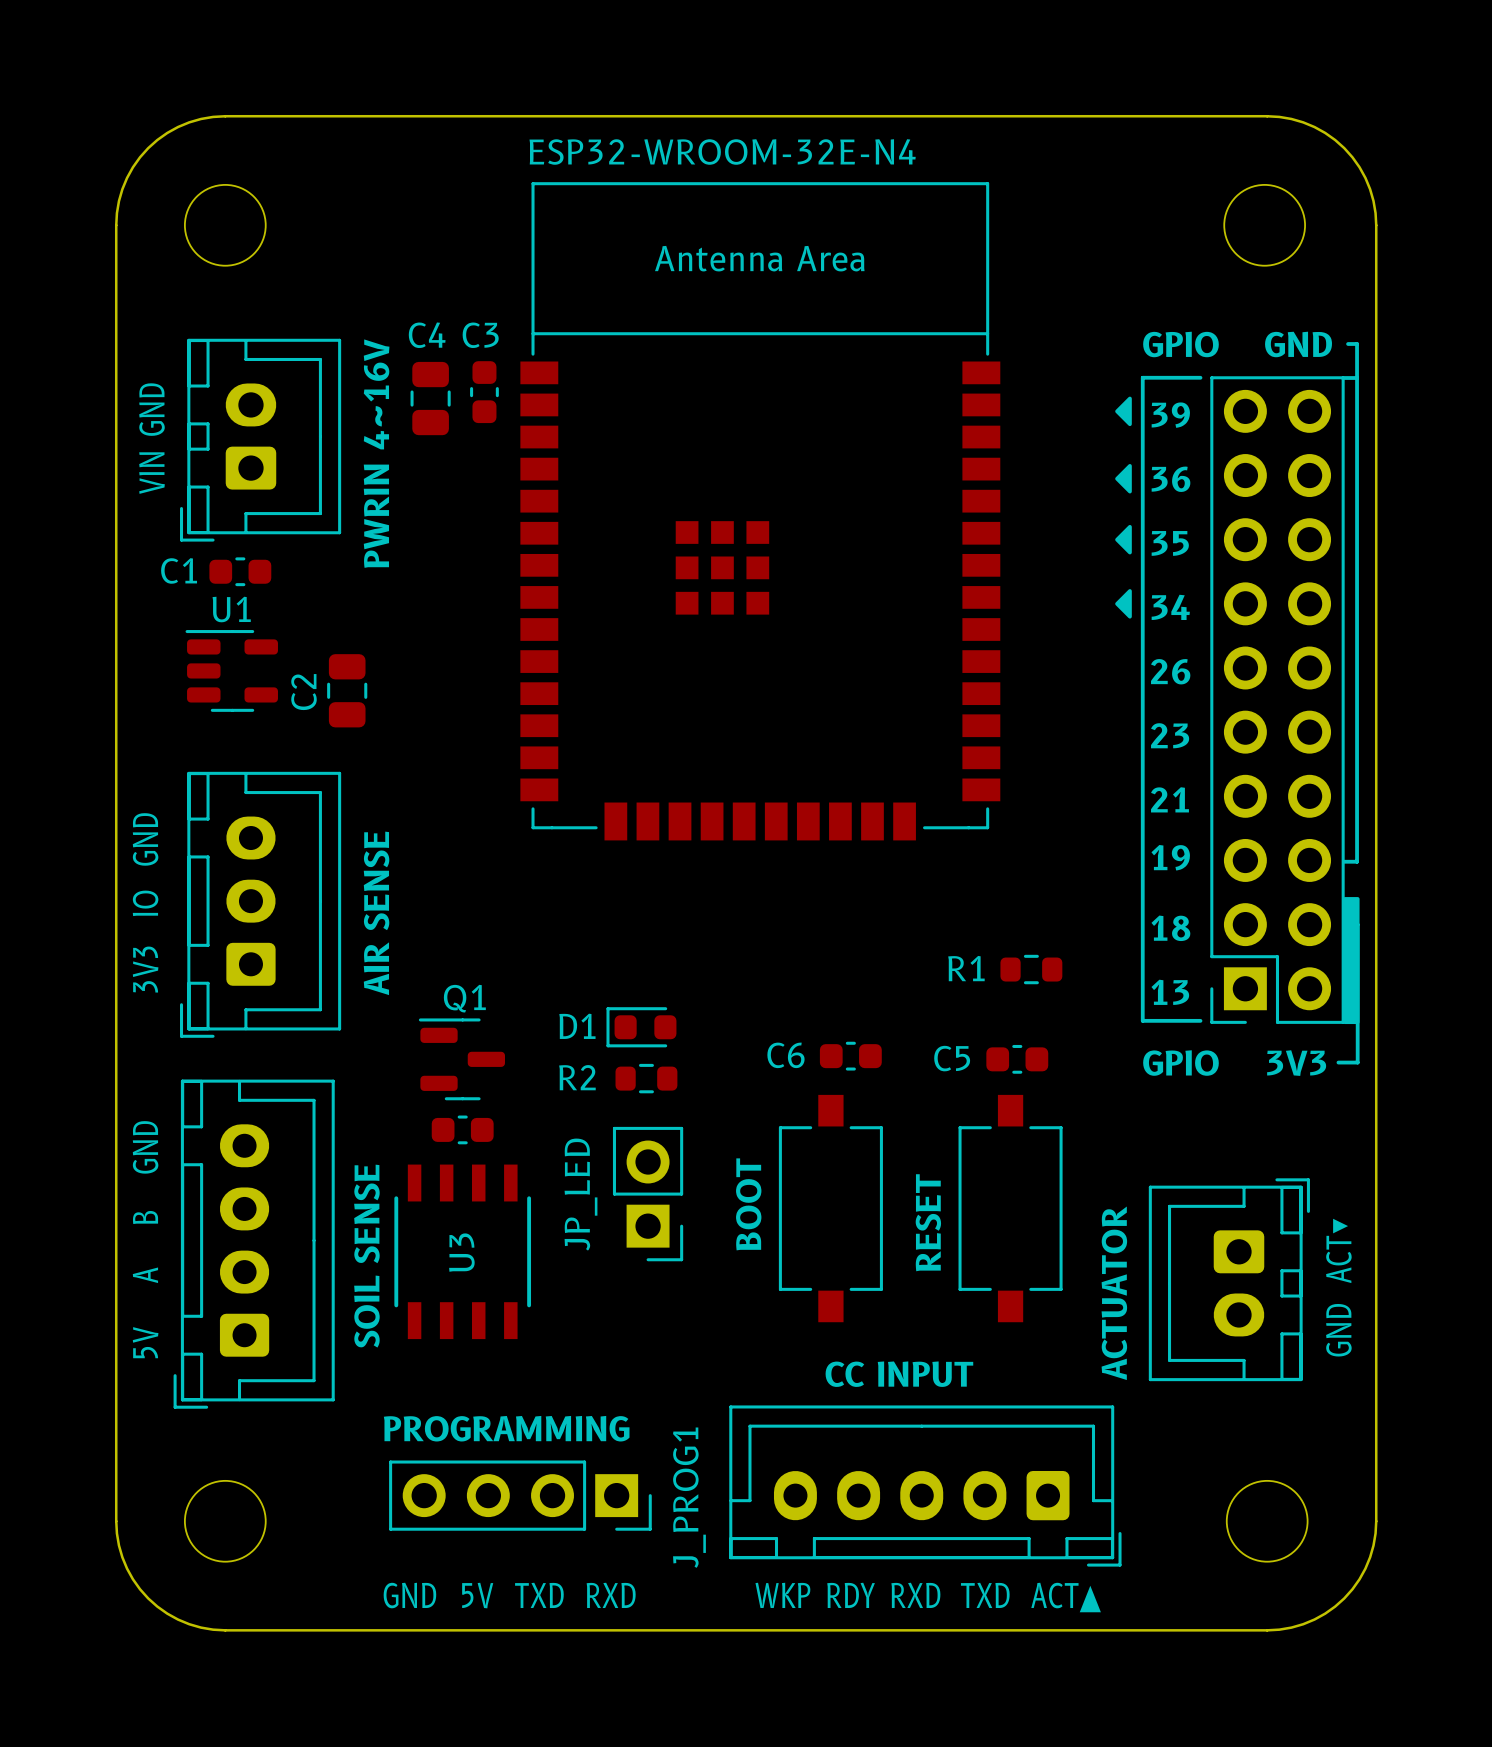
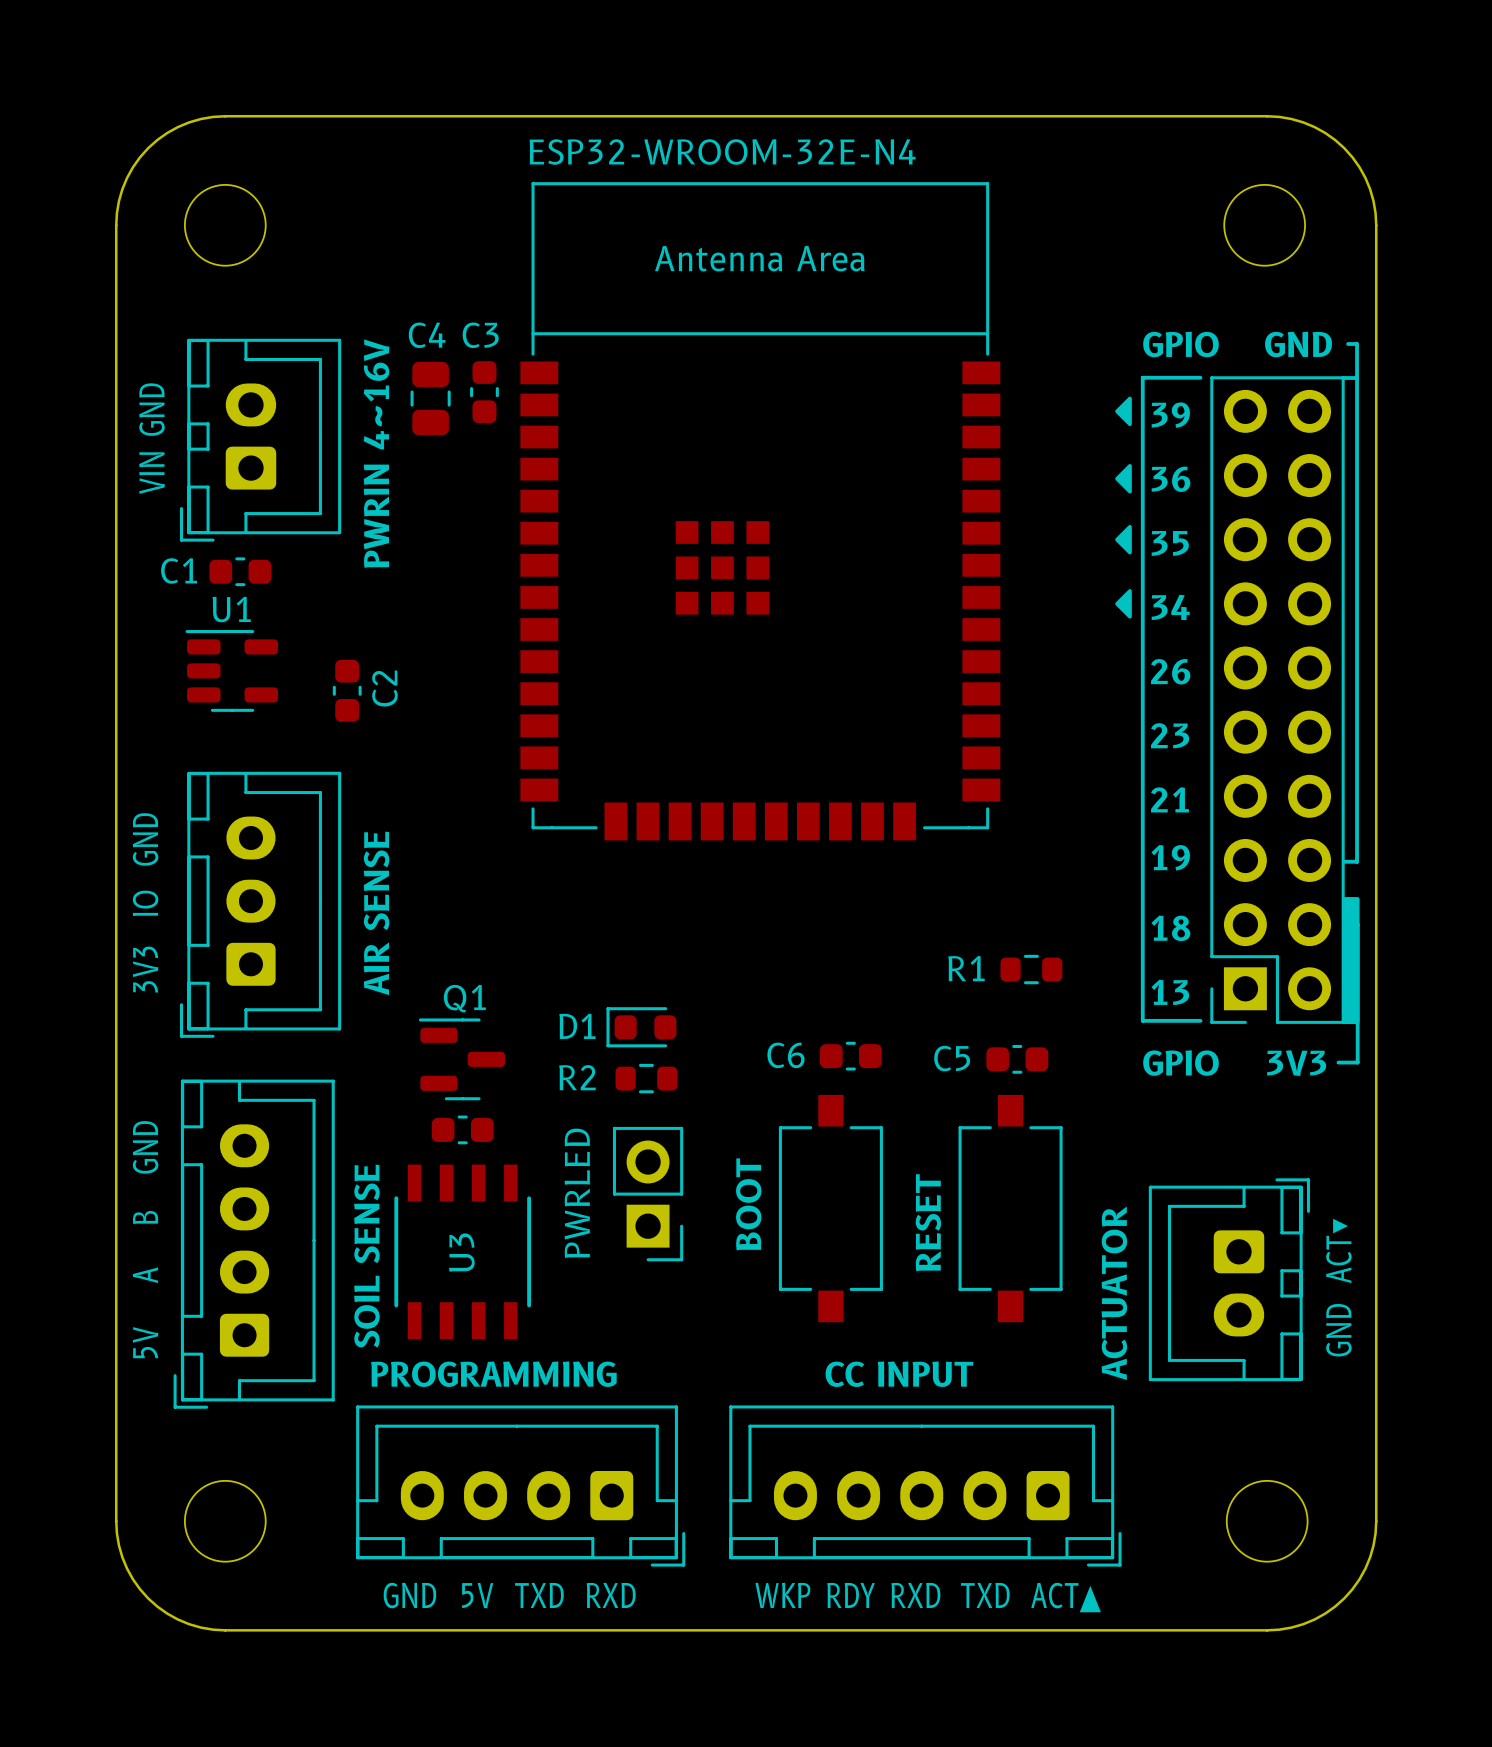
C2 footprint: [327, 654, 368, 728] -> [332, 659, 362, 722]
C2 name position: C2 (303, 692) -> C2 (384, 688)
text: JP_LED (581, 1194) -> PWRLED (577, 1193)
text position: PROGRAMMING (506, 1428) -> PROGRAMMING (493, 1374)
part: none -> (520, 1486)
J_PROG1: (520, 1495) -> none

